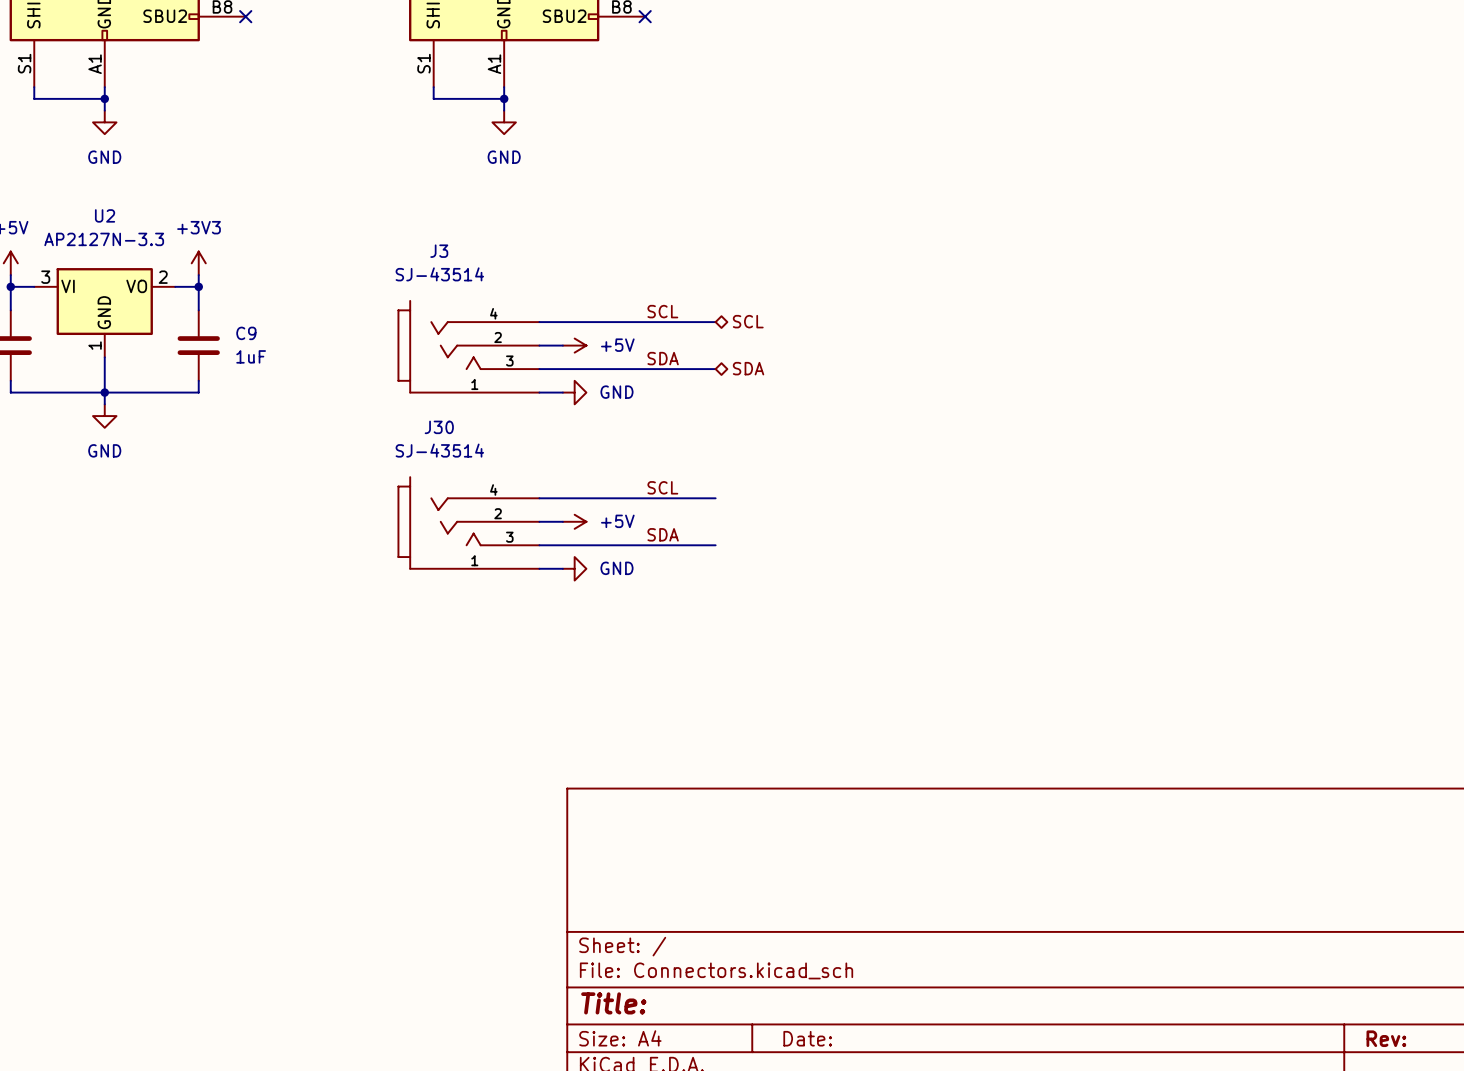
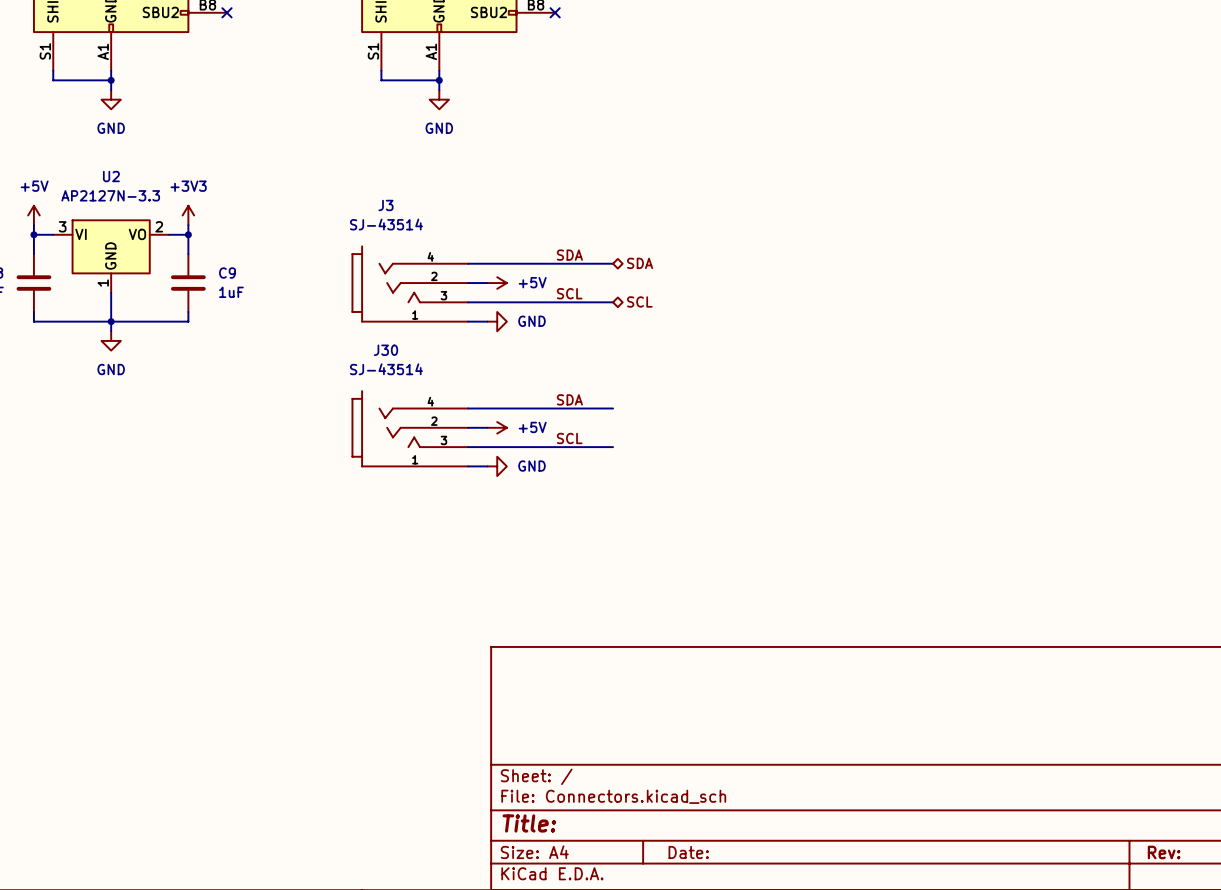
label: SCL (662, 311) -> SDA (569, 255)
hierarchical label: SCL (748, 321) -> SDA (640, 263)
label: SDA (663, 358) -> SCL (569, 293)
hierarchical label: SDA (748, 368) -> SCL (639, 301)
label: SCL (662, 487) -> SDA (569, 399)
label: SDA (663, 534) -> SCL (569, 438)

